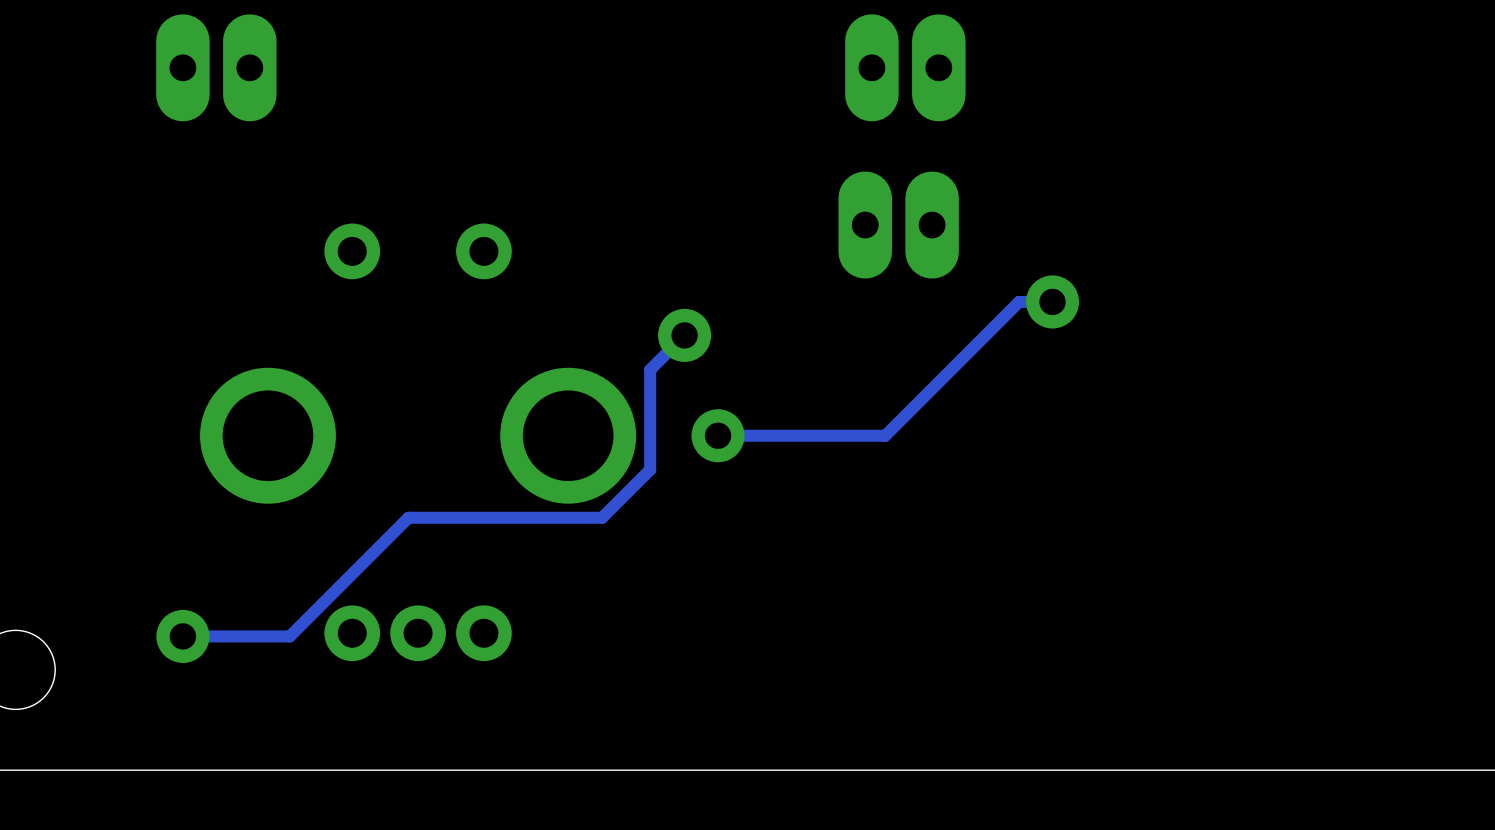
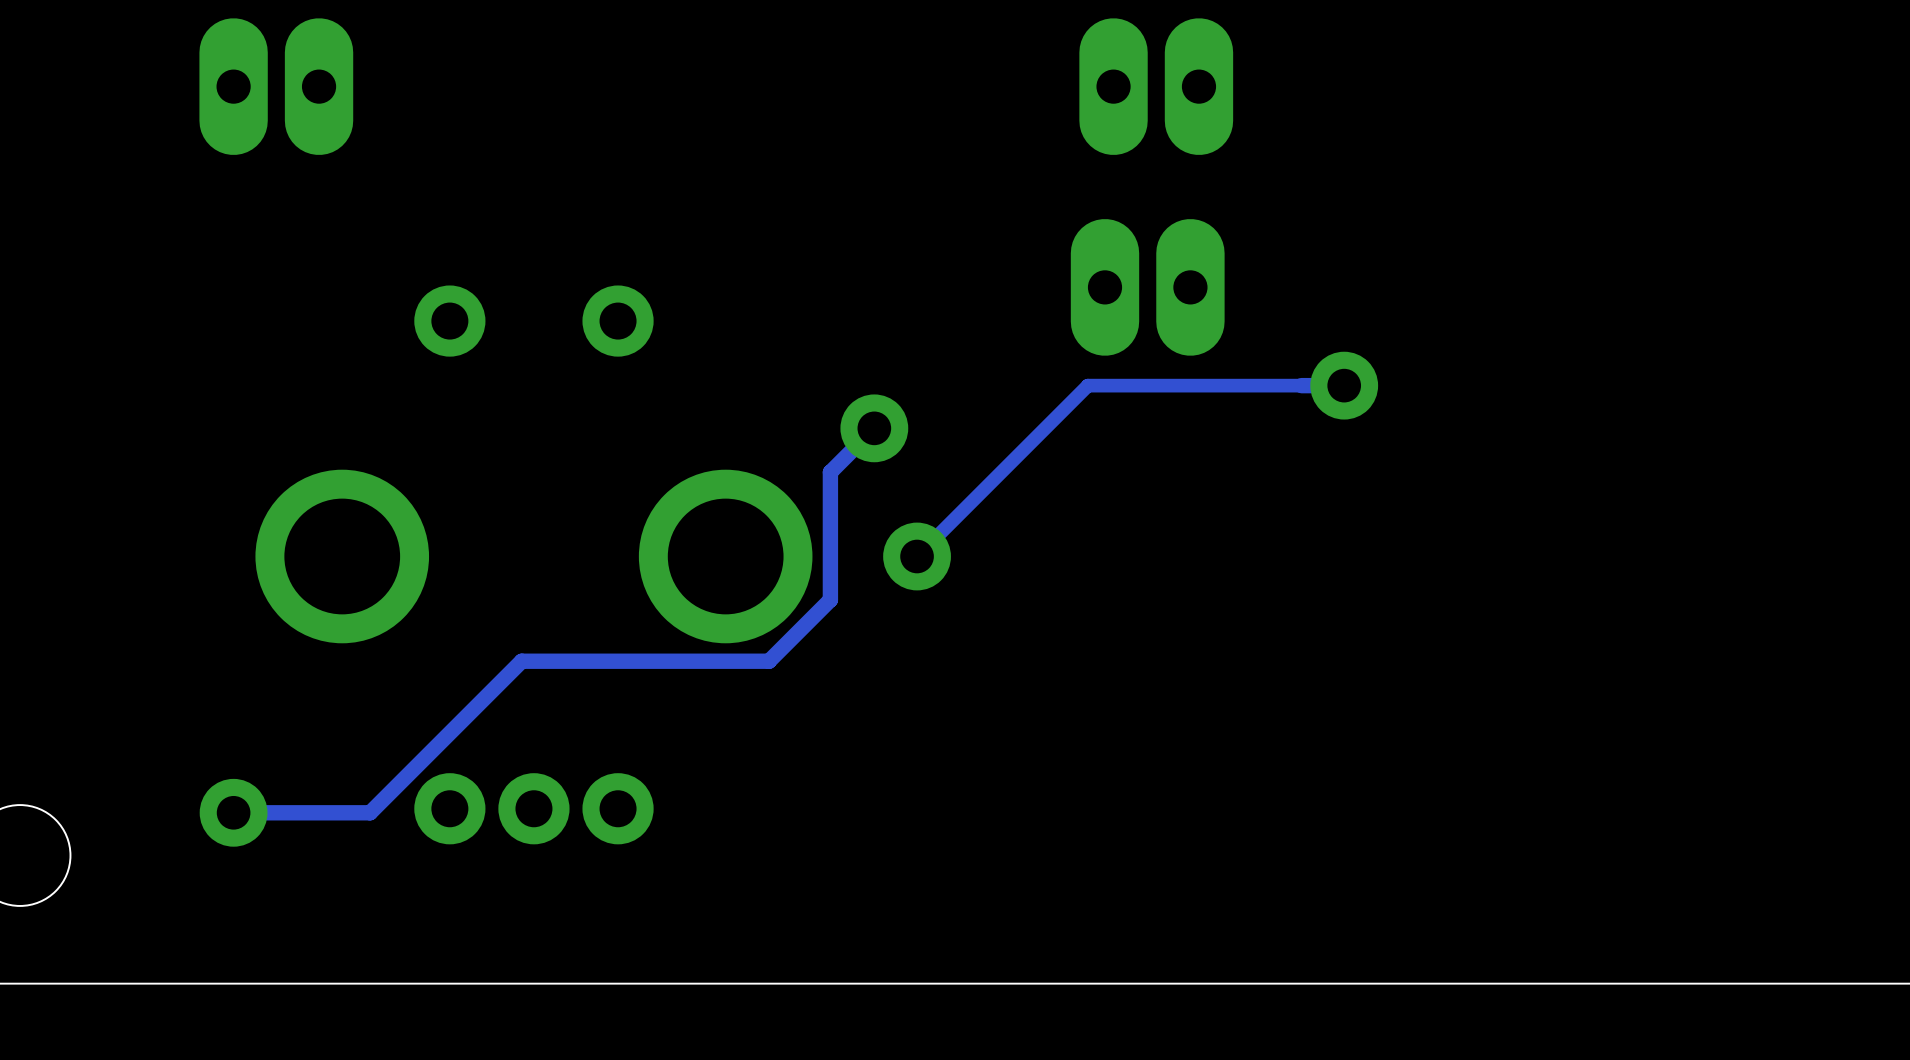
track: (1019, 301) (885, 435) (718, 435) -> (1301, 385) (1087, 385) (917, 556)

